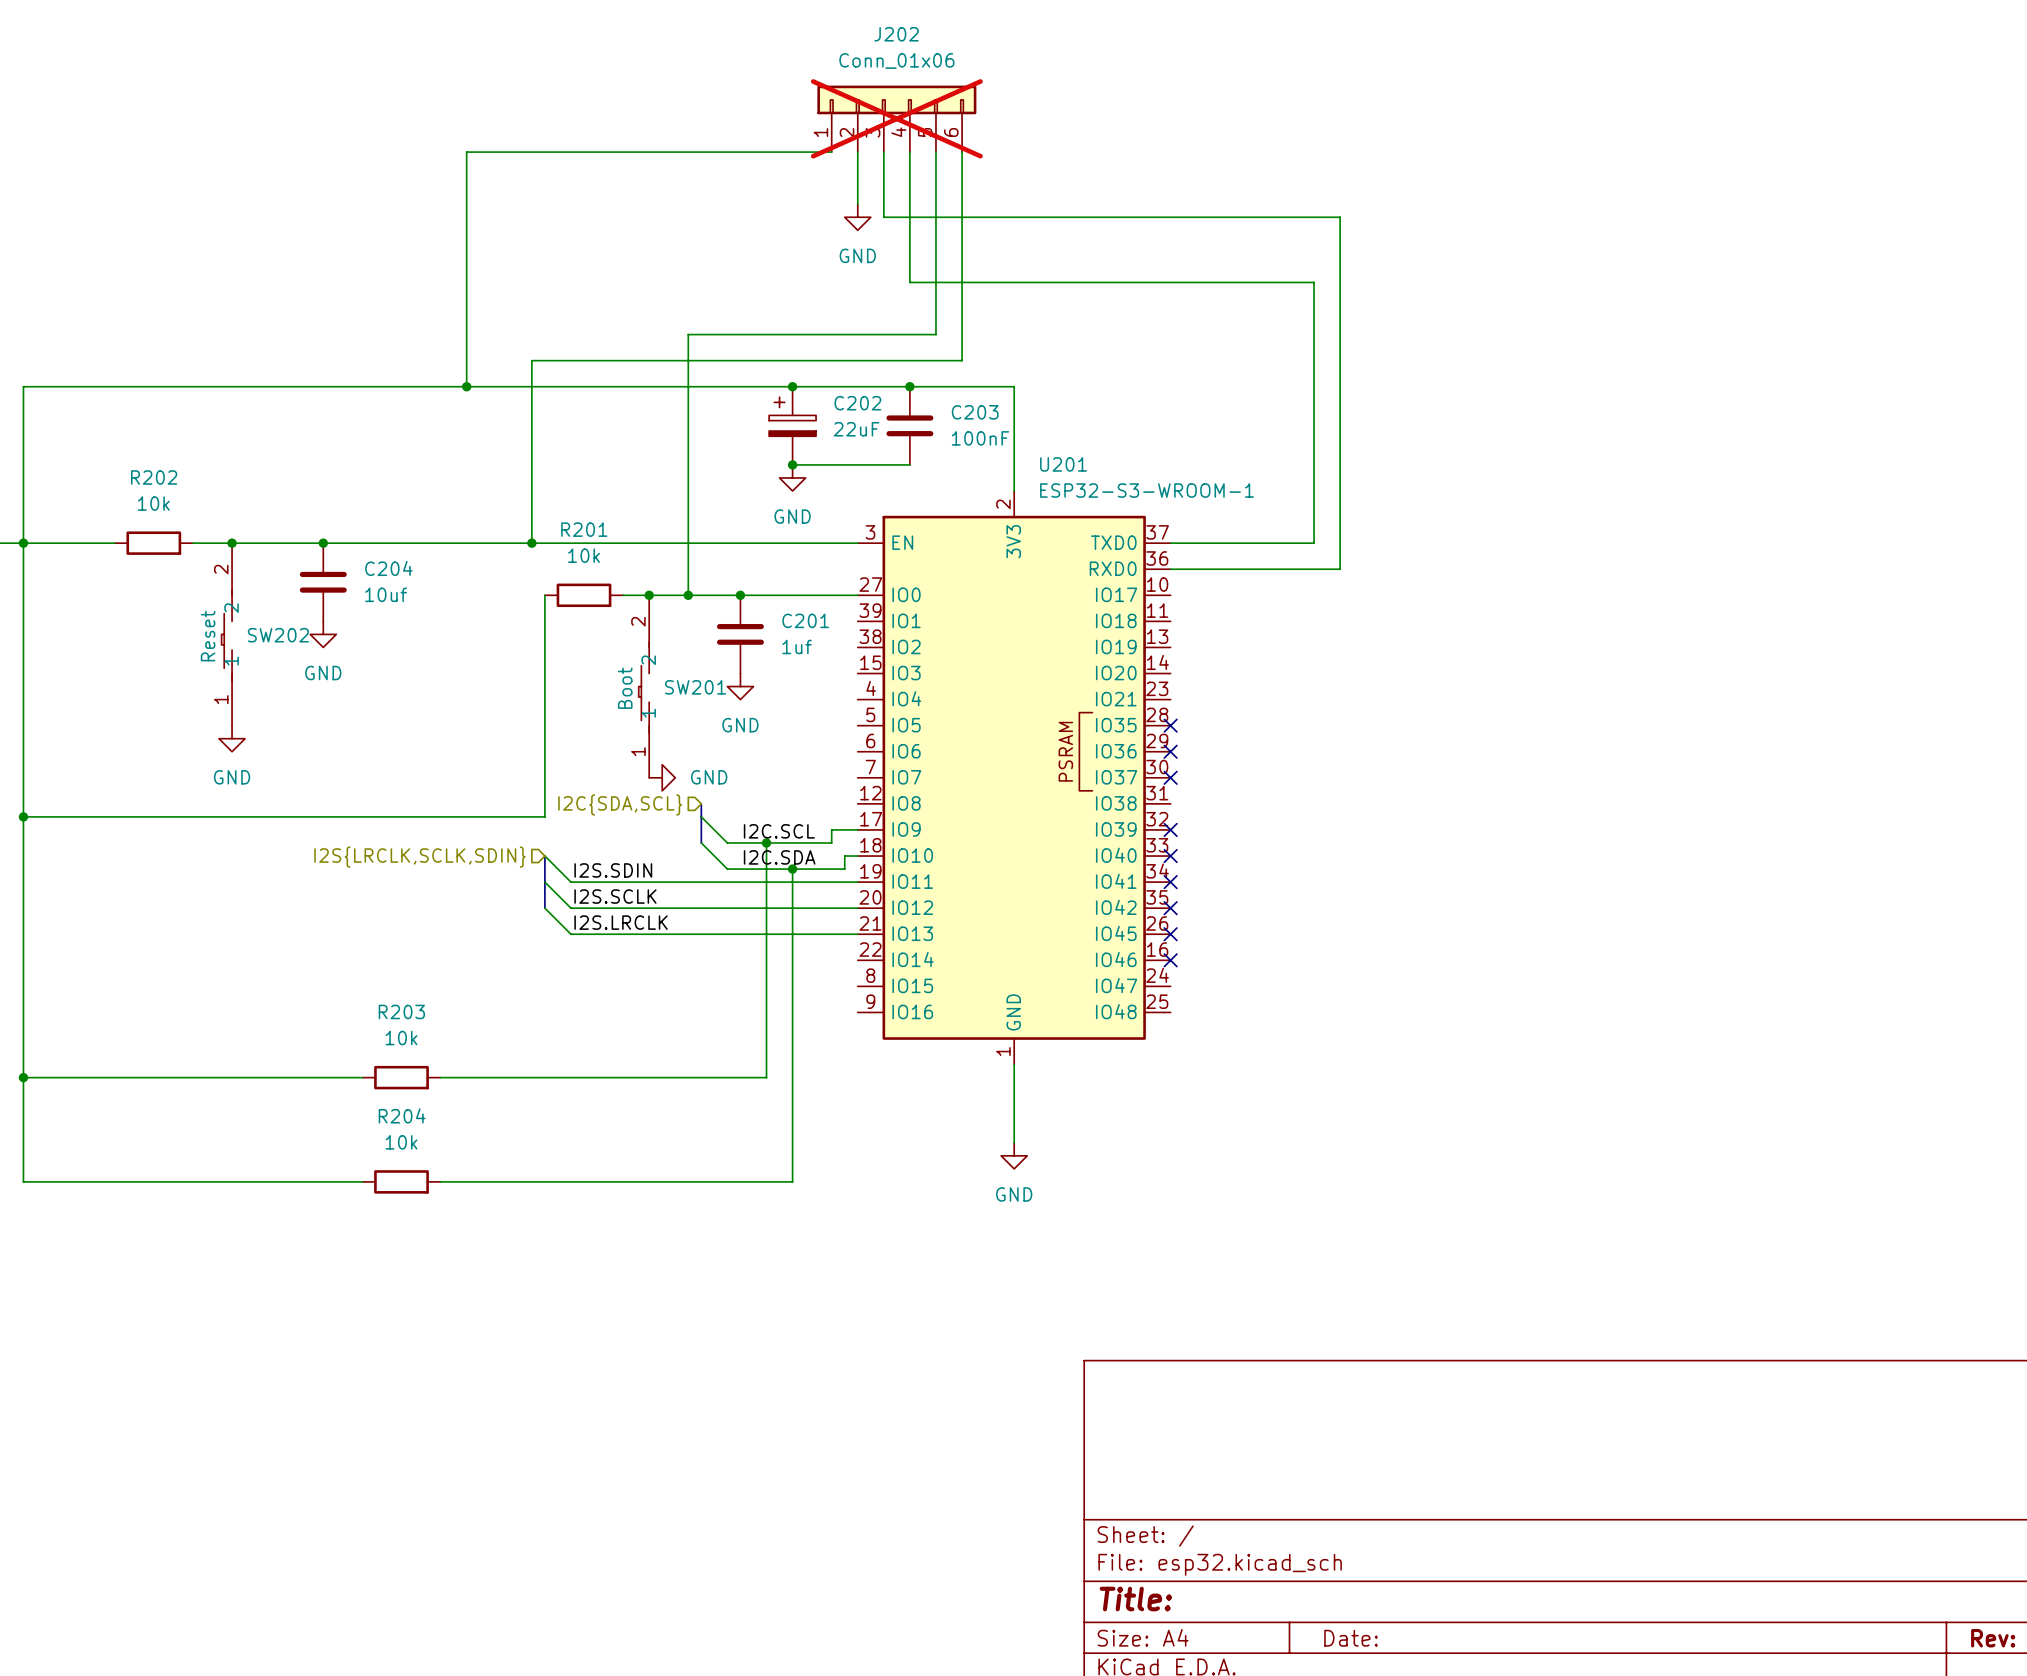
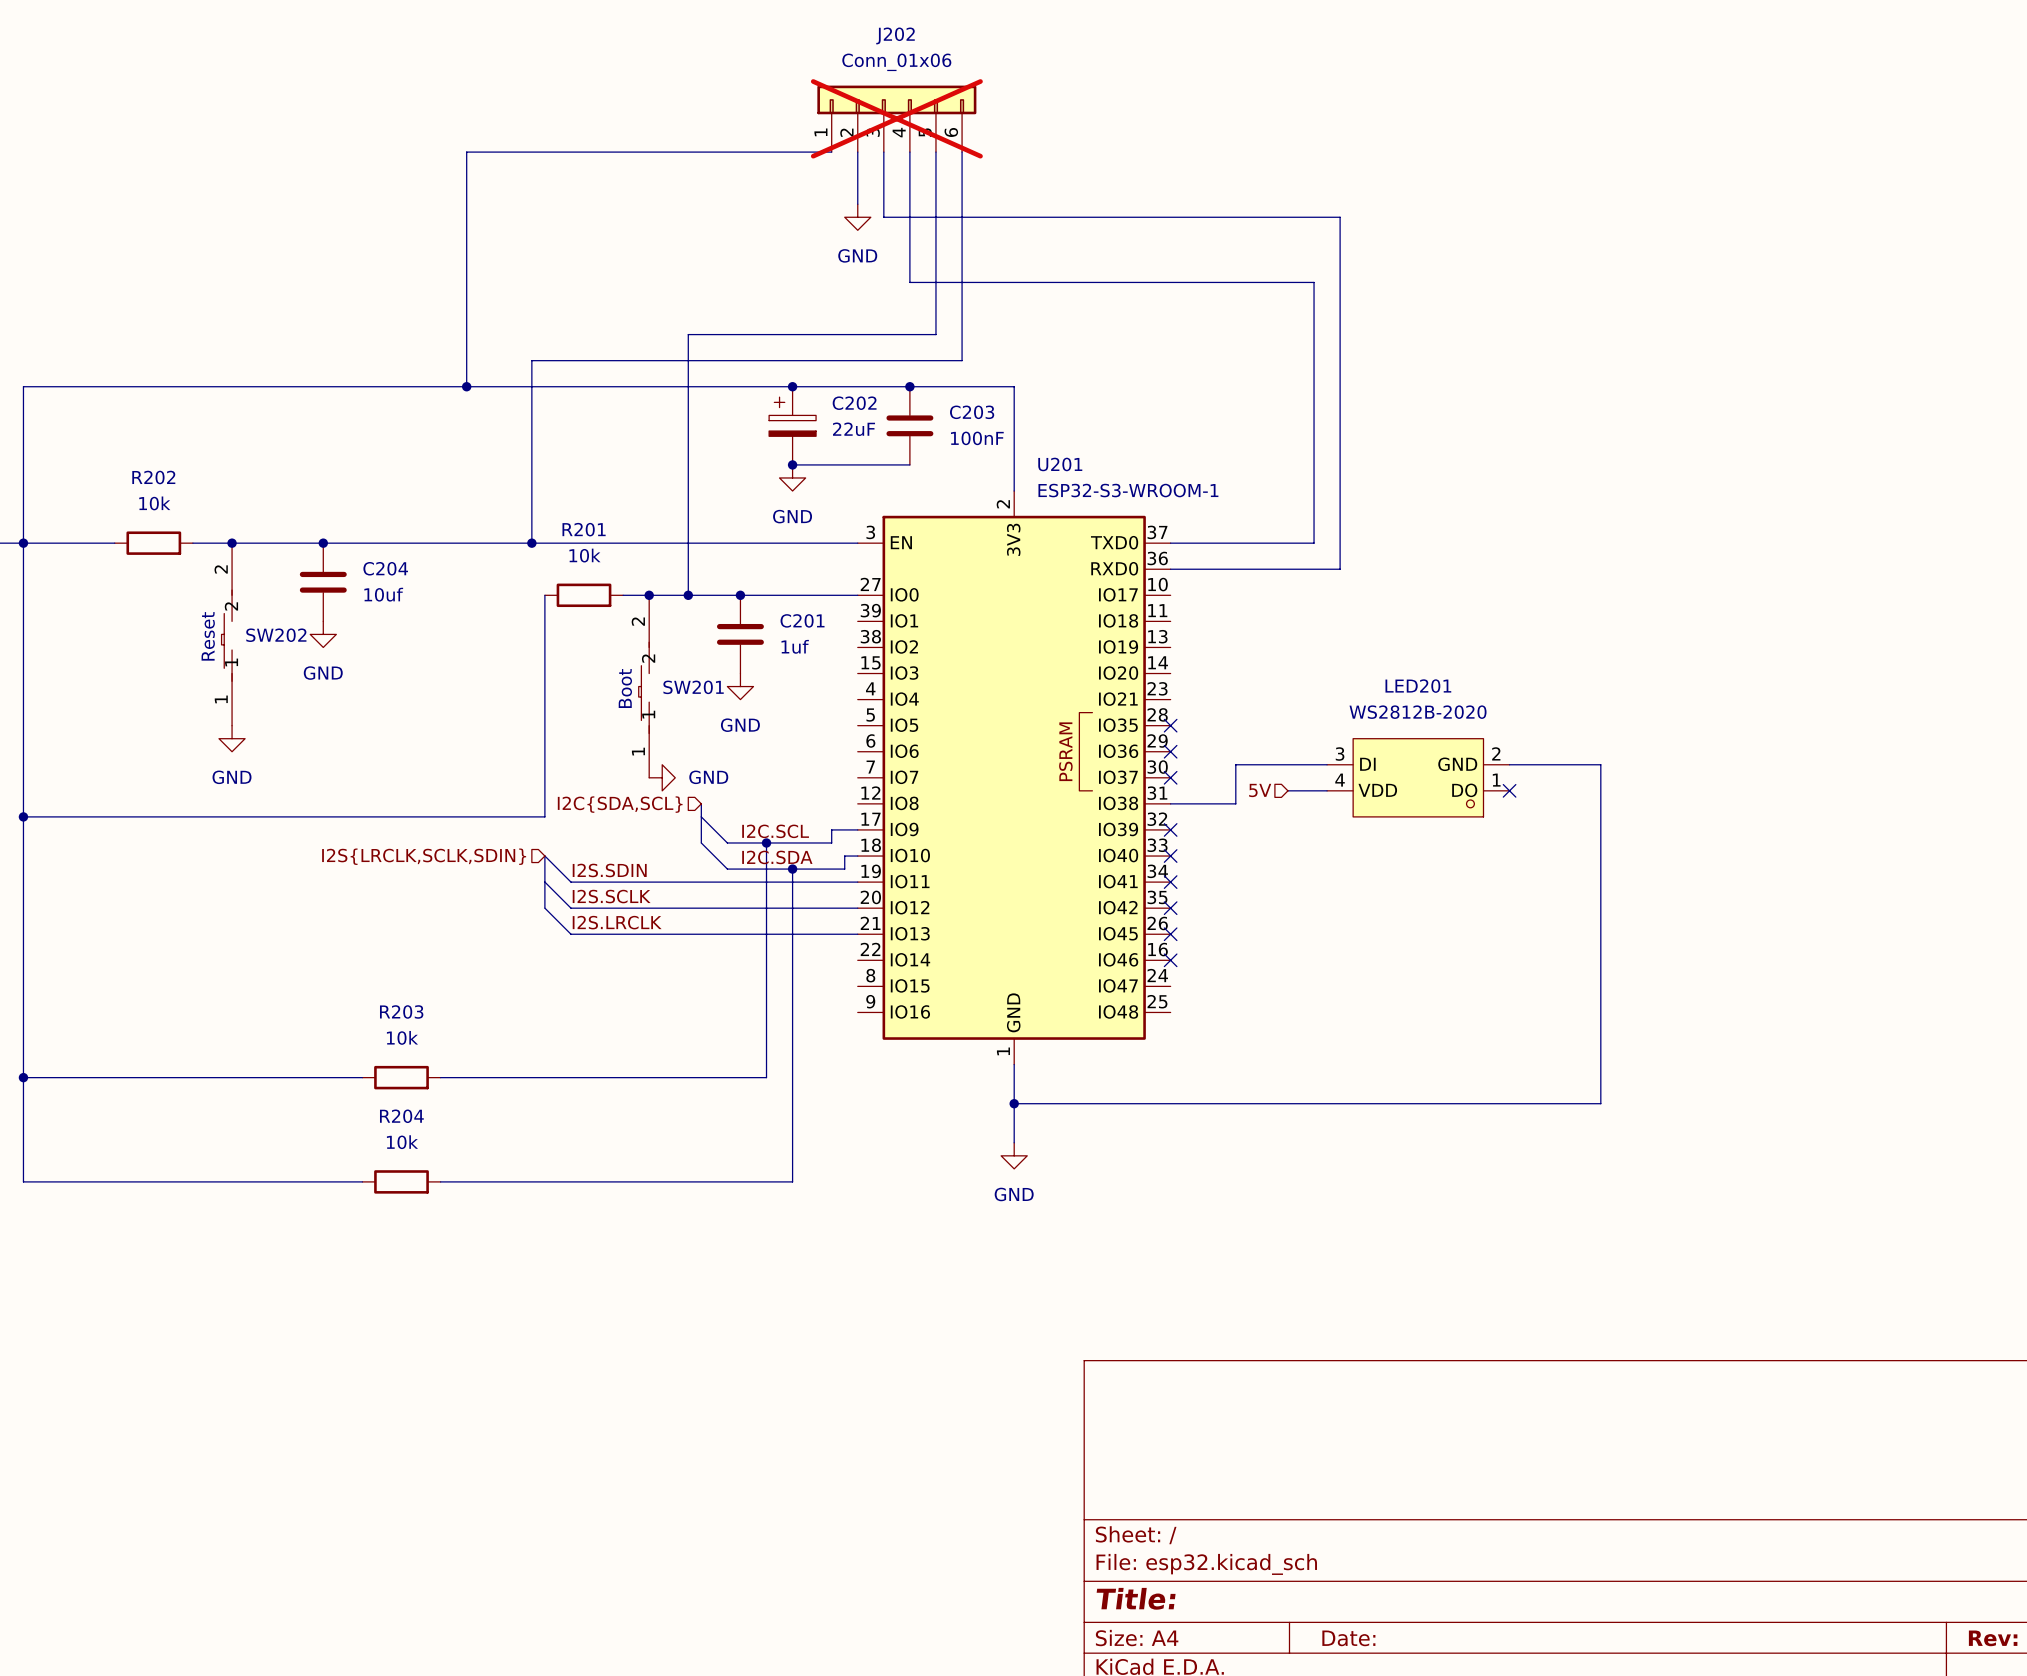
wire: none -> (1327, 764) (1235, 764) (1235, 803) (1170, 803)
wire: none -> (1509, 764) (1600, 764) (1600, 1103) (1014, 1103)
LED201: none -> WS2812B-2020 (1418, 777)
hierarchical label: none -> 5V (1260, 790)
wire: none -> (1287, 790) (1327, 790)
no-connect mark: none -> (1509, 790)
junction: none -> (1014, 1103)

